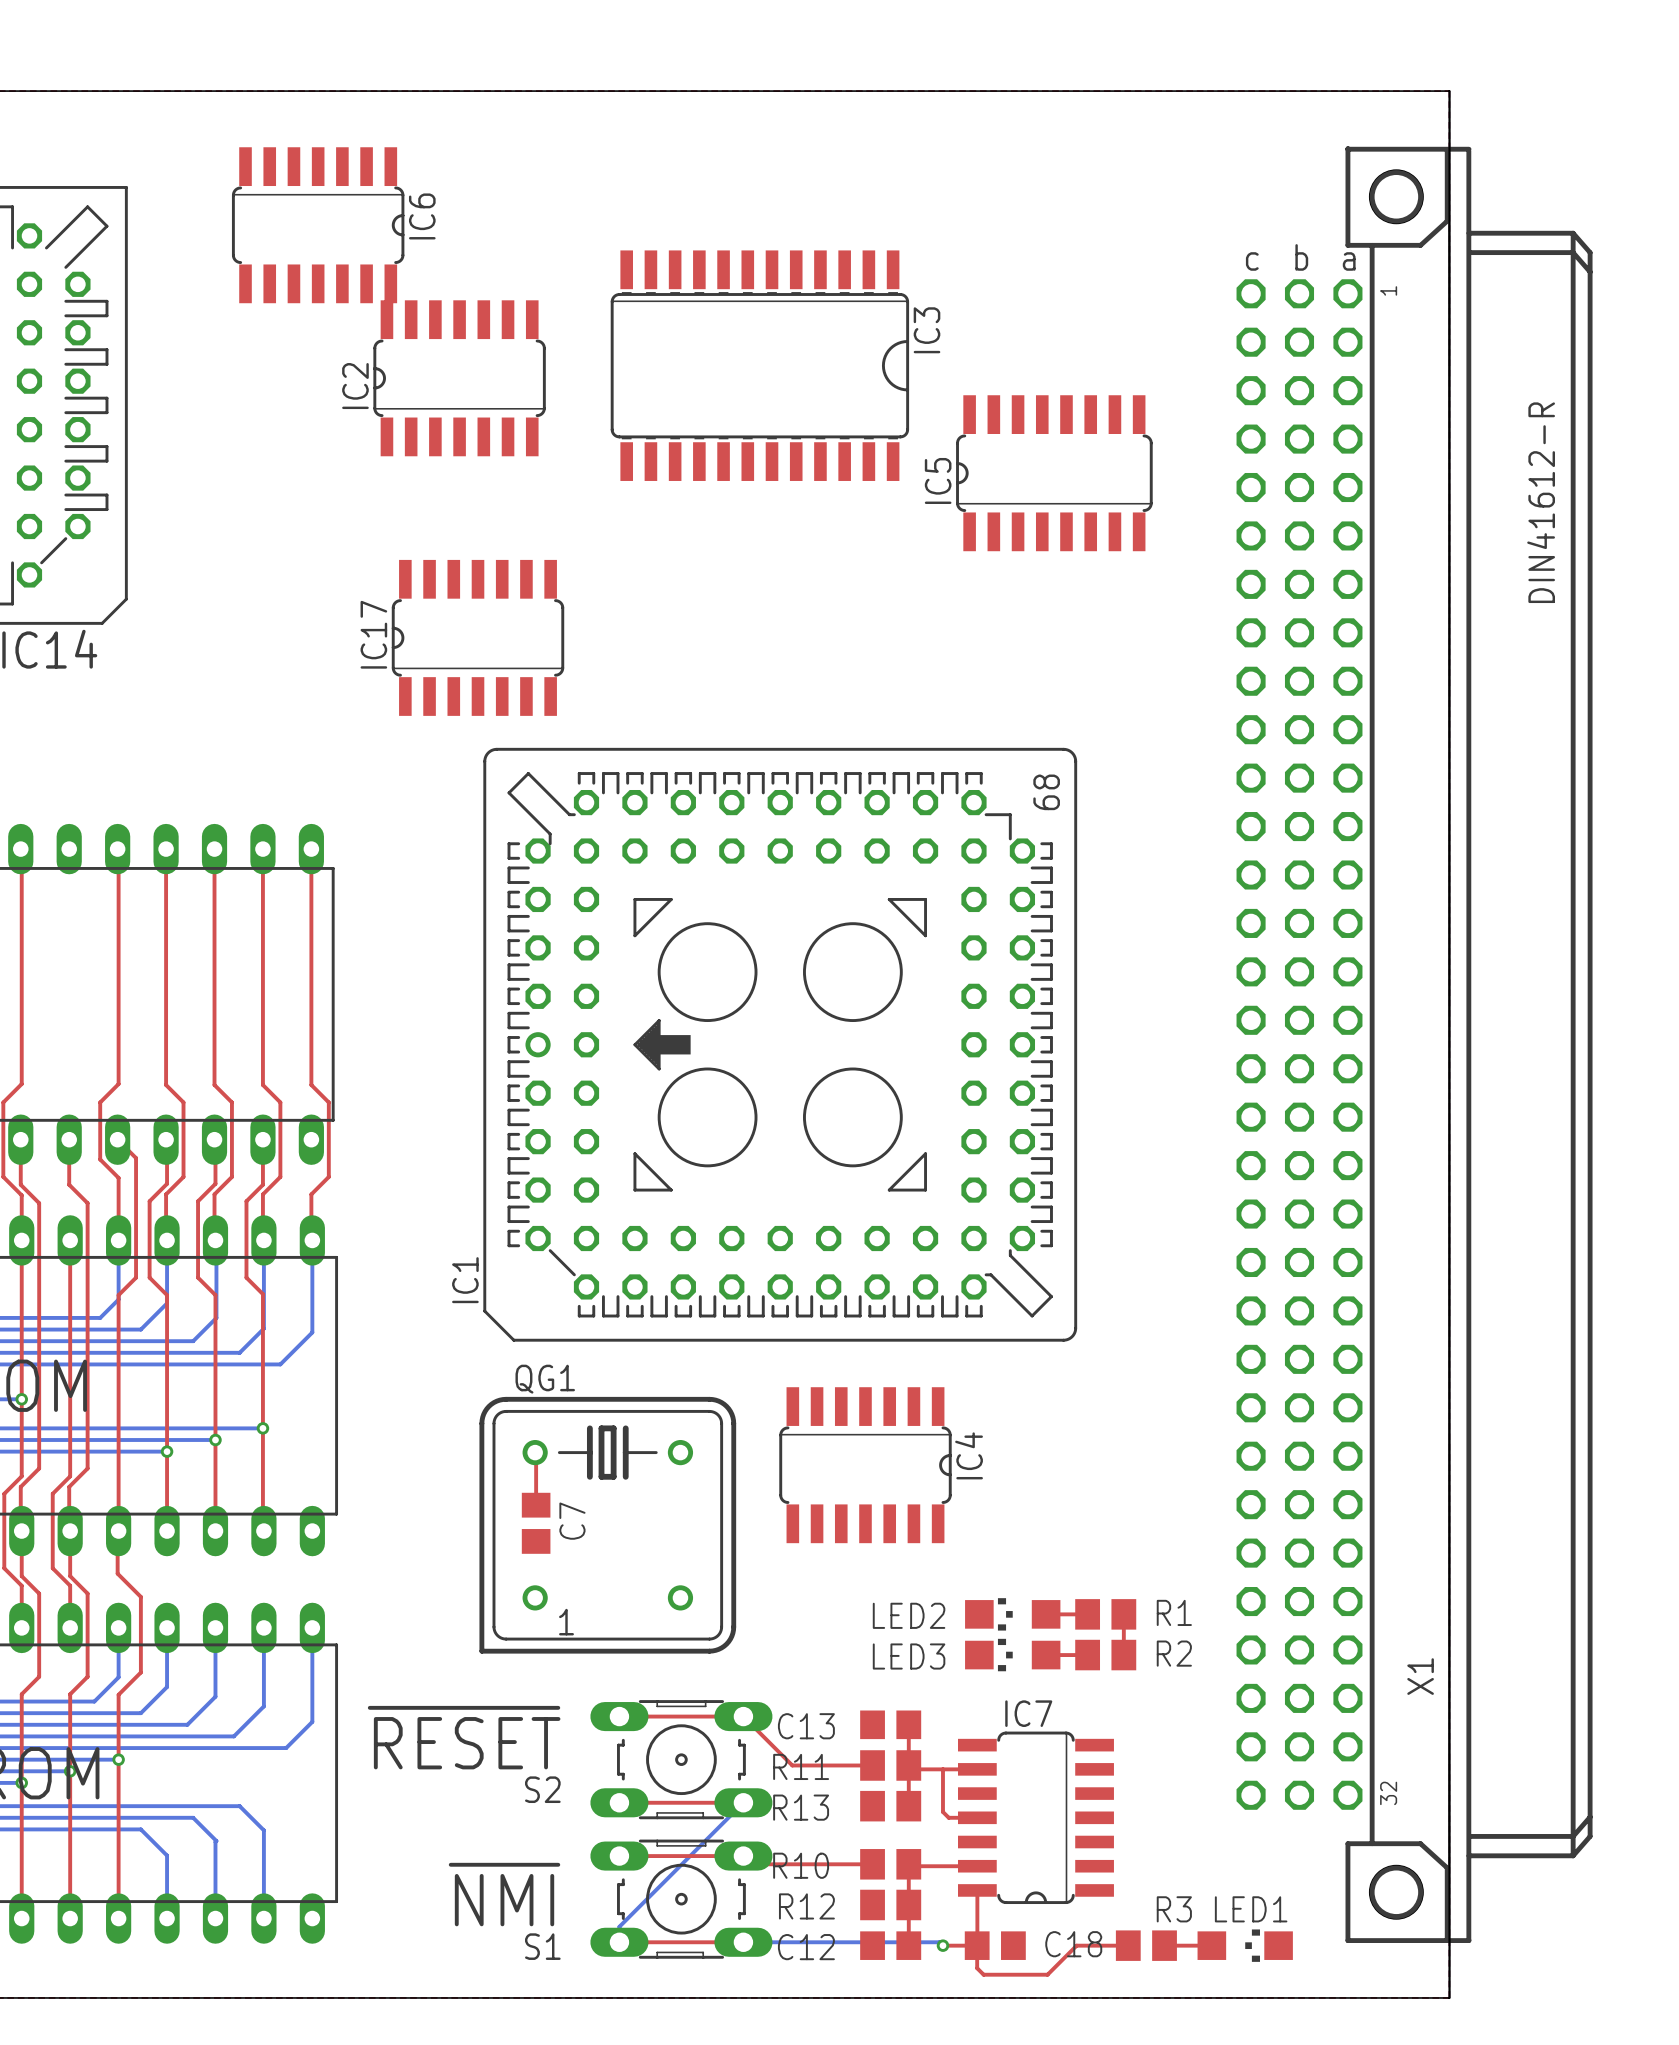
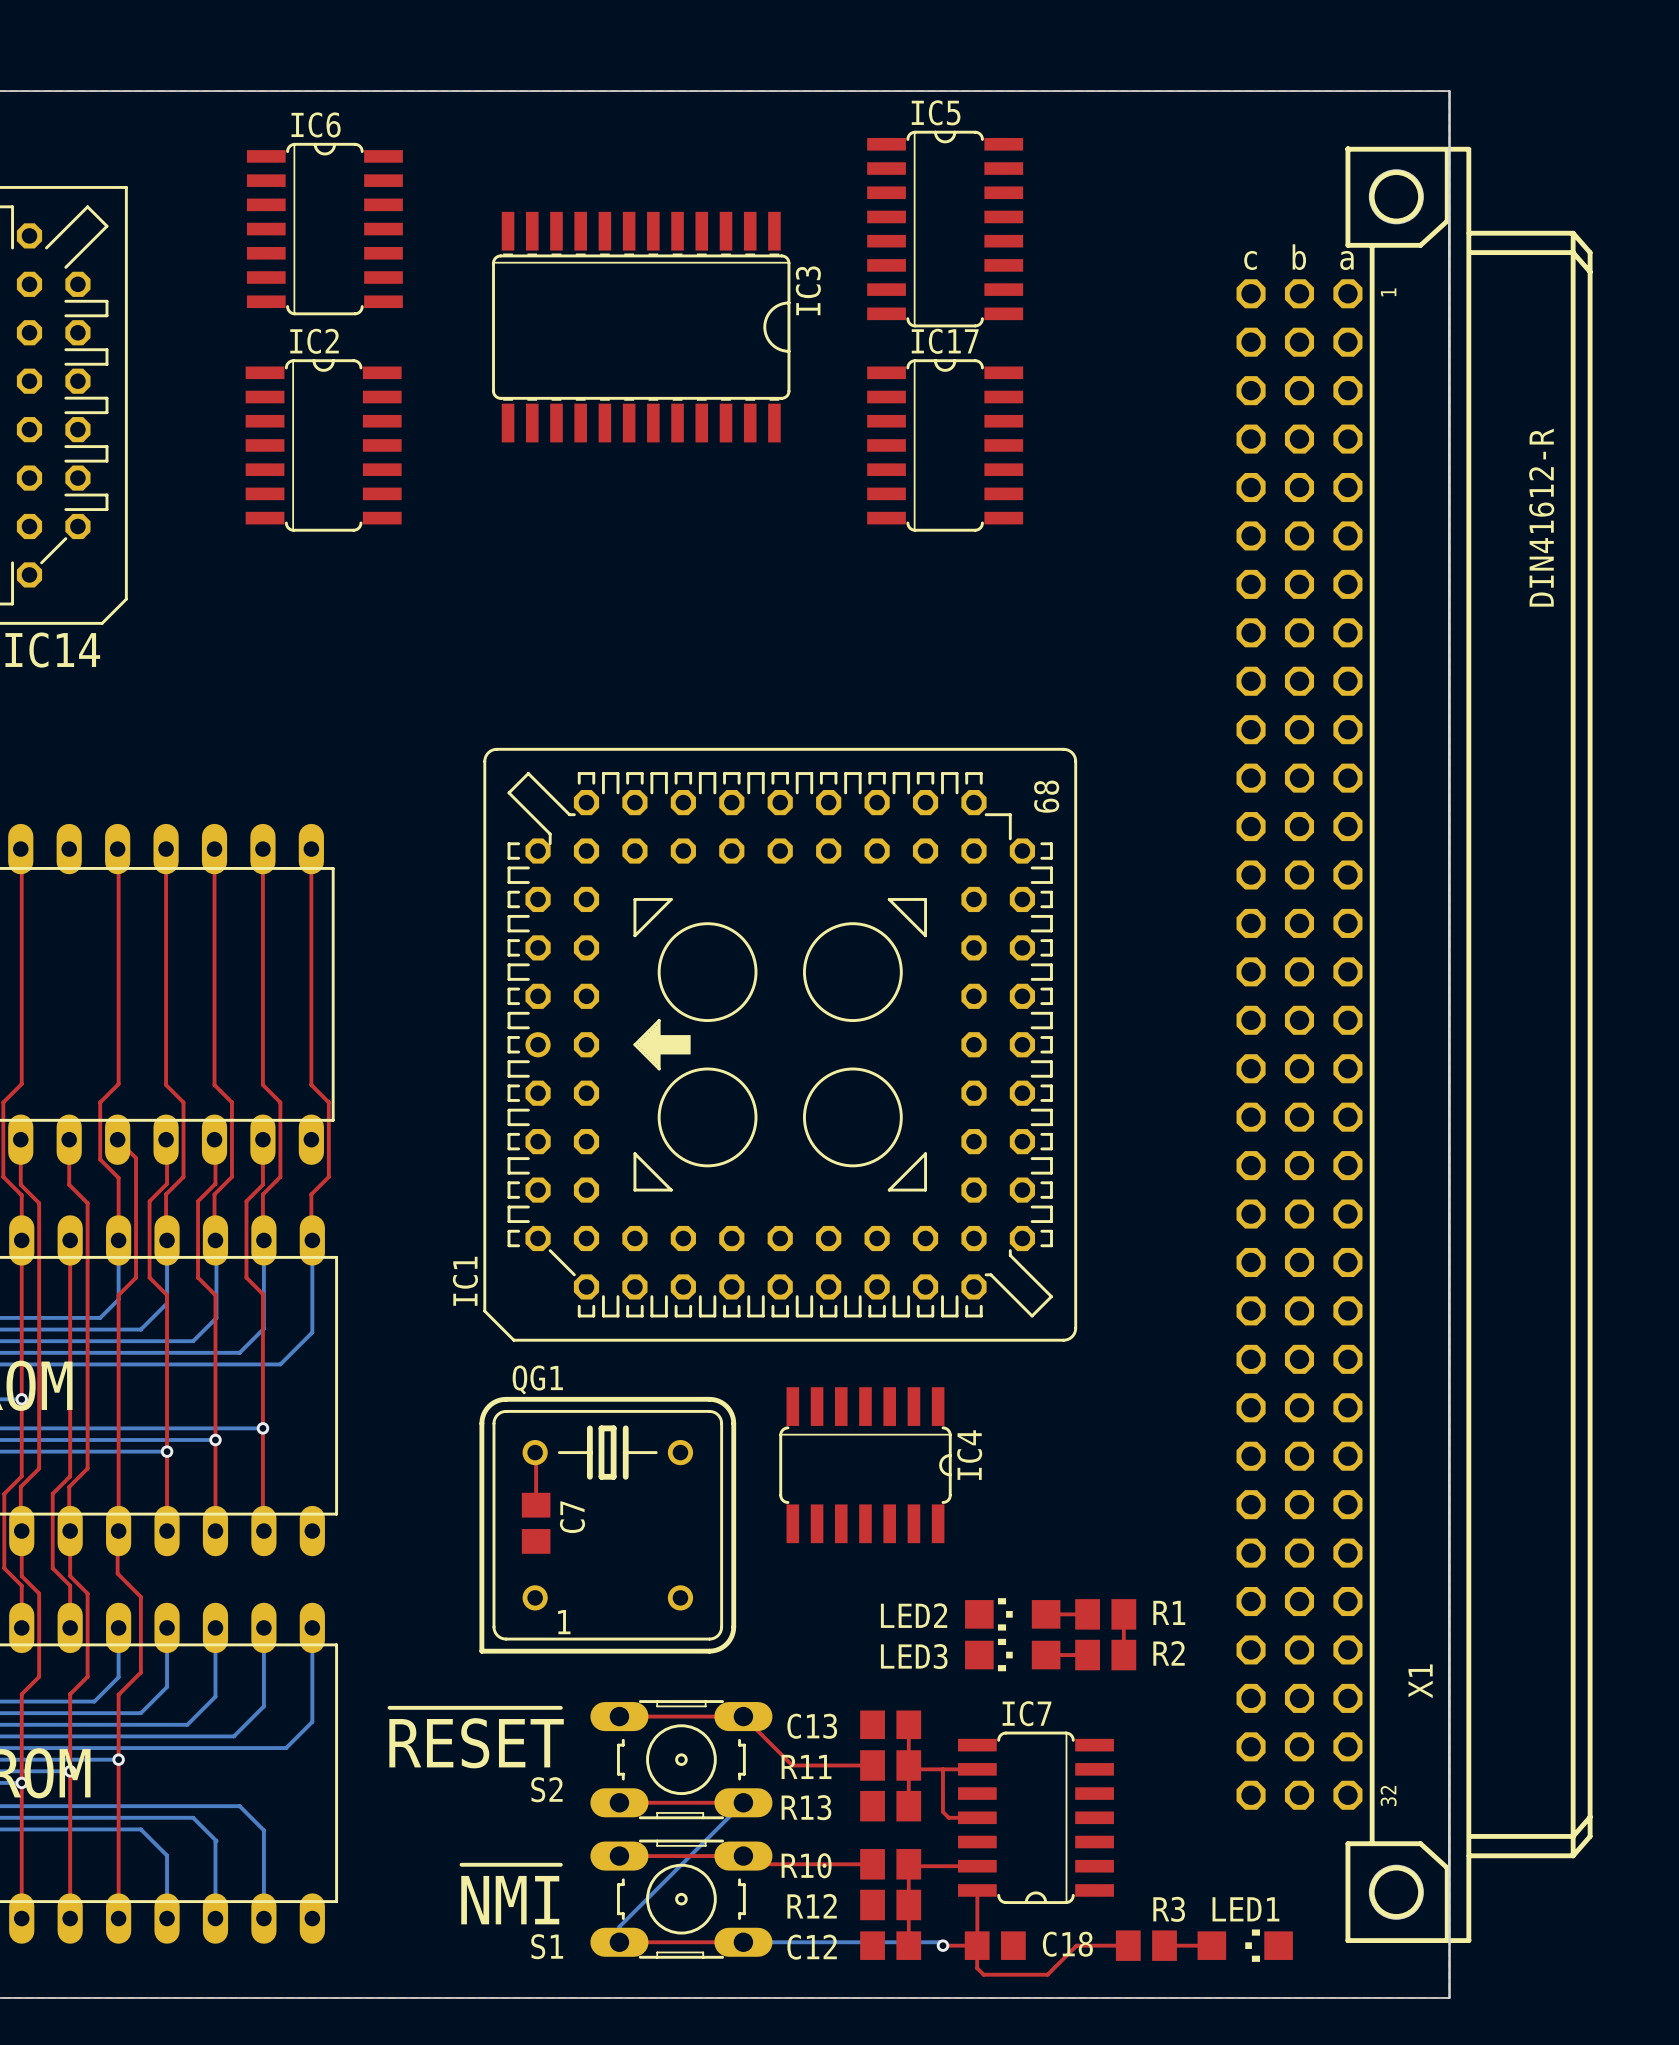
IC6 rotation: 0° (318, 225) -> 90° counterclockwise (324, 229)
IC3 position: (759, 365) -> (641, 327)
IC2 rotation: 0° (459, 378) -> 90° clockwise (323, 445)
IC2 position: (459, 378) -> (323, 445)
IC5 rotation: 0° (1054, 473) -> 90° clockwise (945, 229)
IC5 position: (1054, 473) -> (945, 229)
IC17 rotation: 0° (478, 637) -> 90° clockwise (945, 445)
IC17 position: (478, 637) -> (945, 445)

